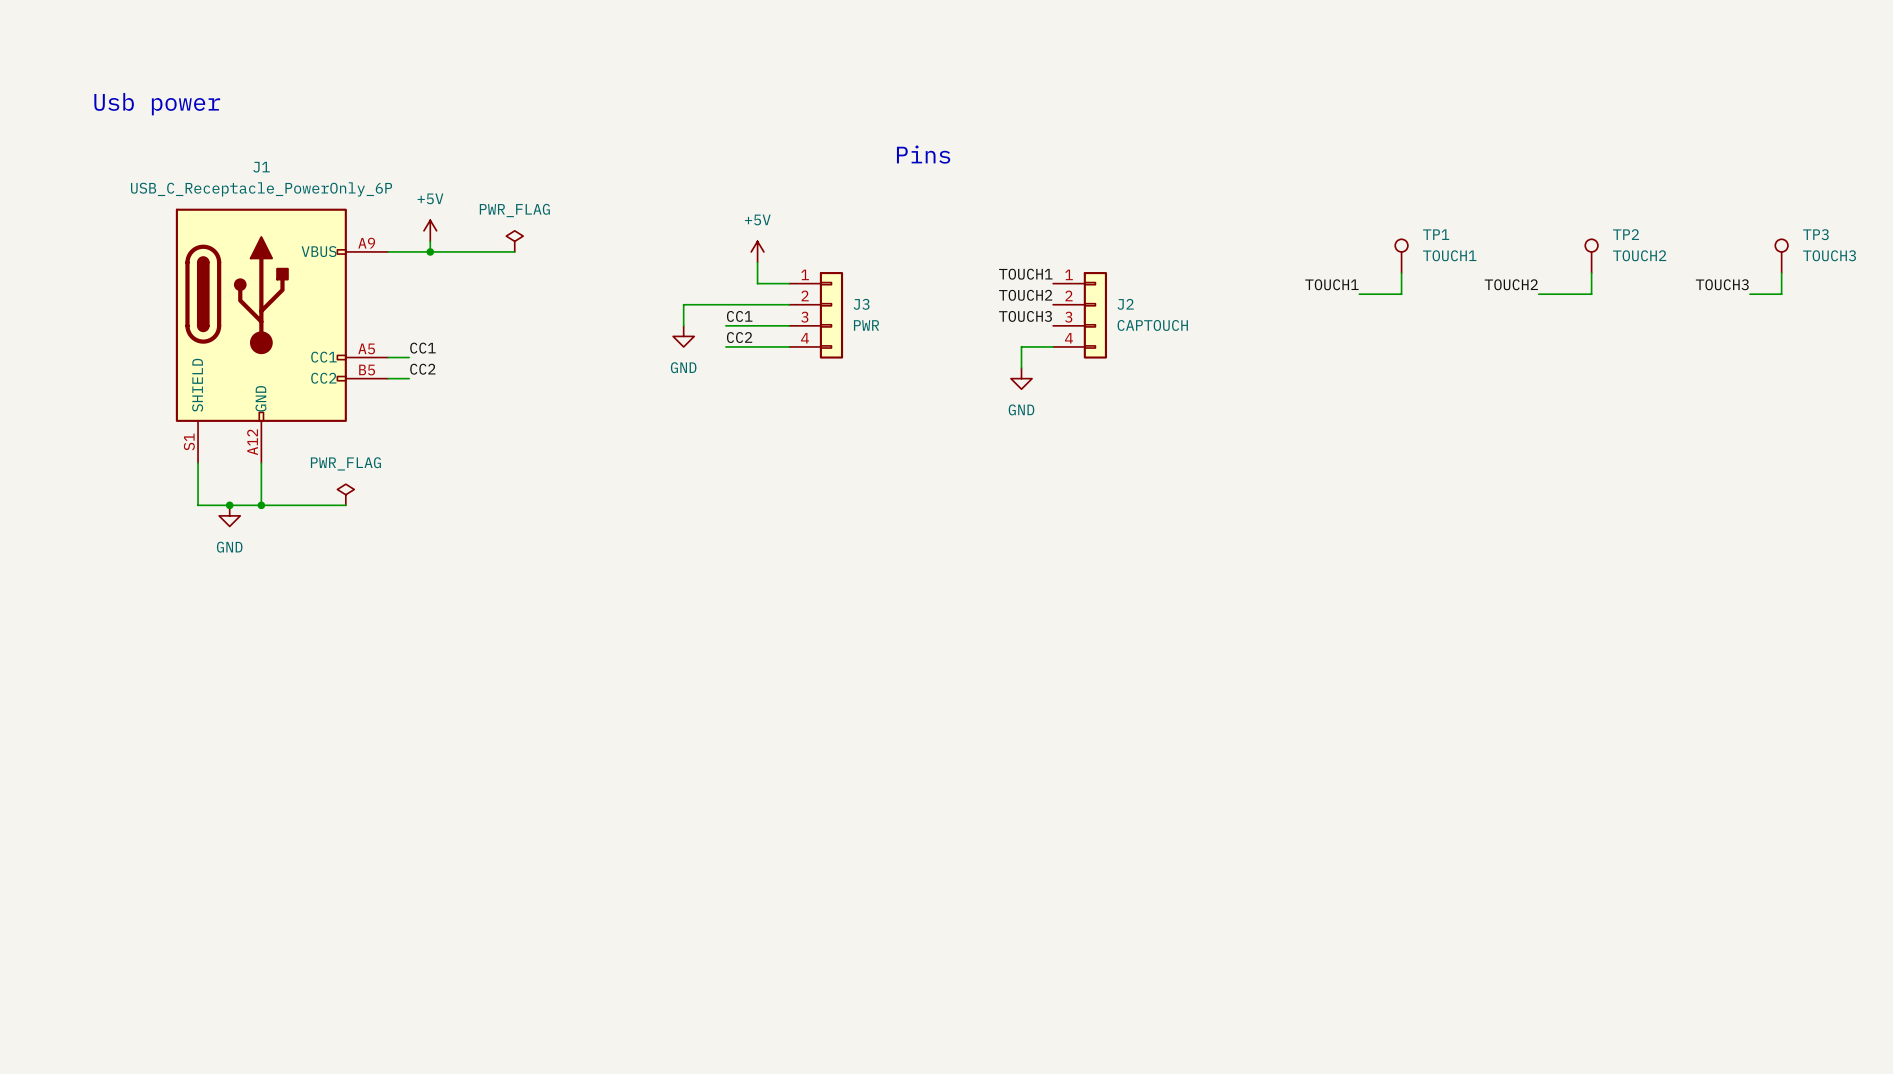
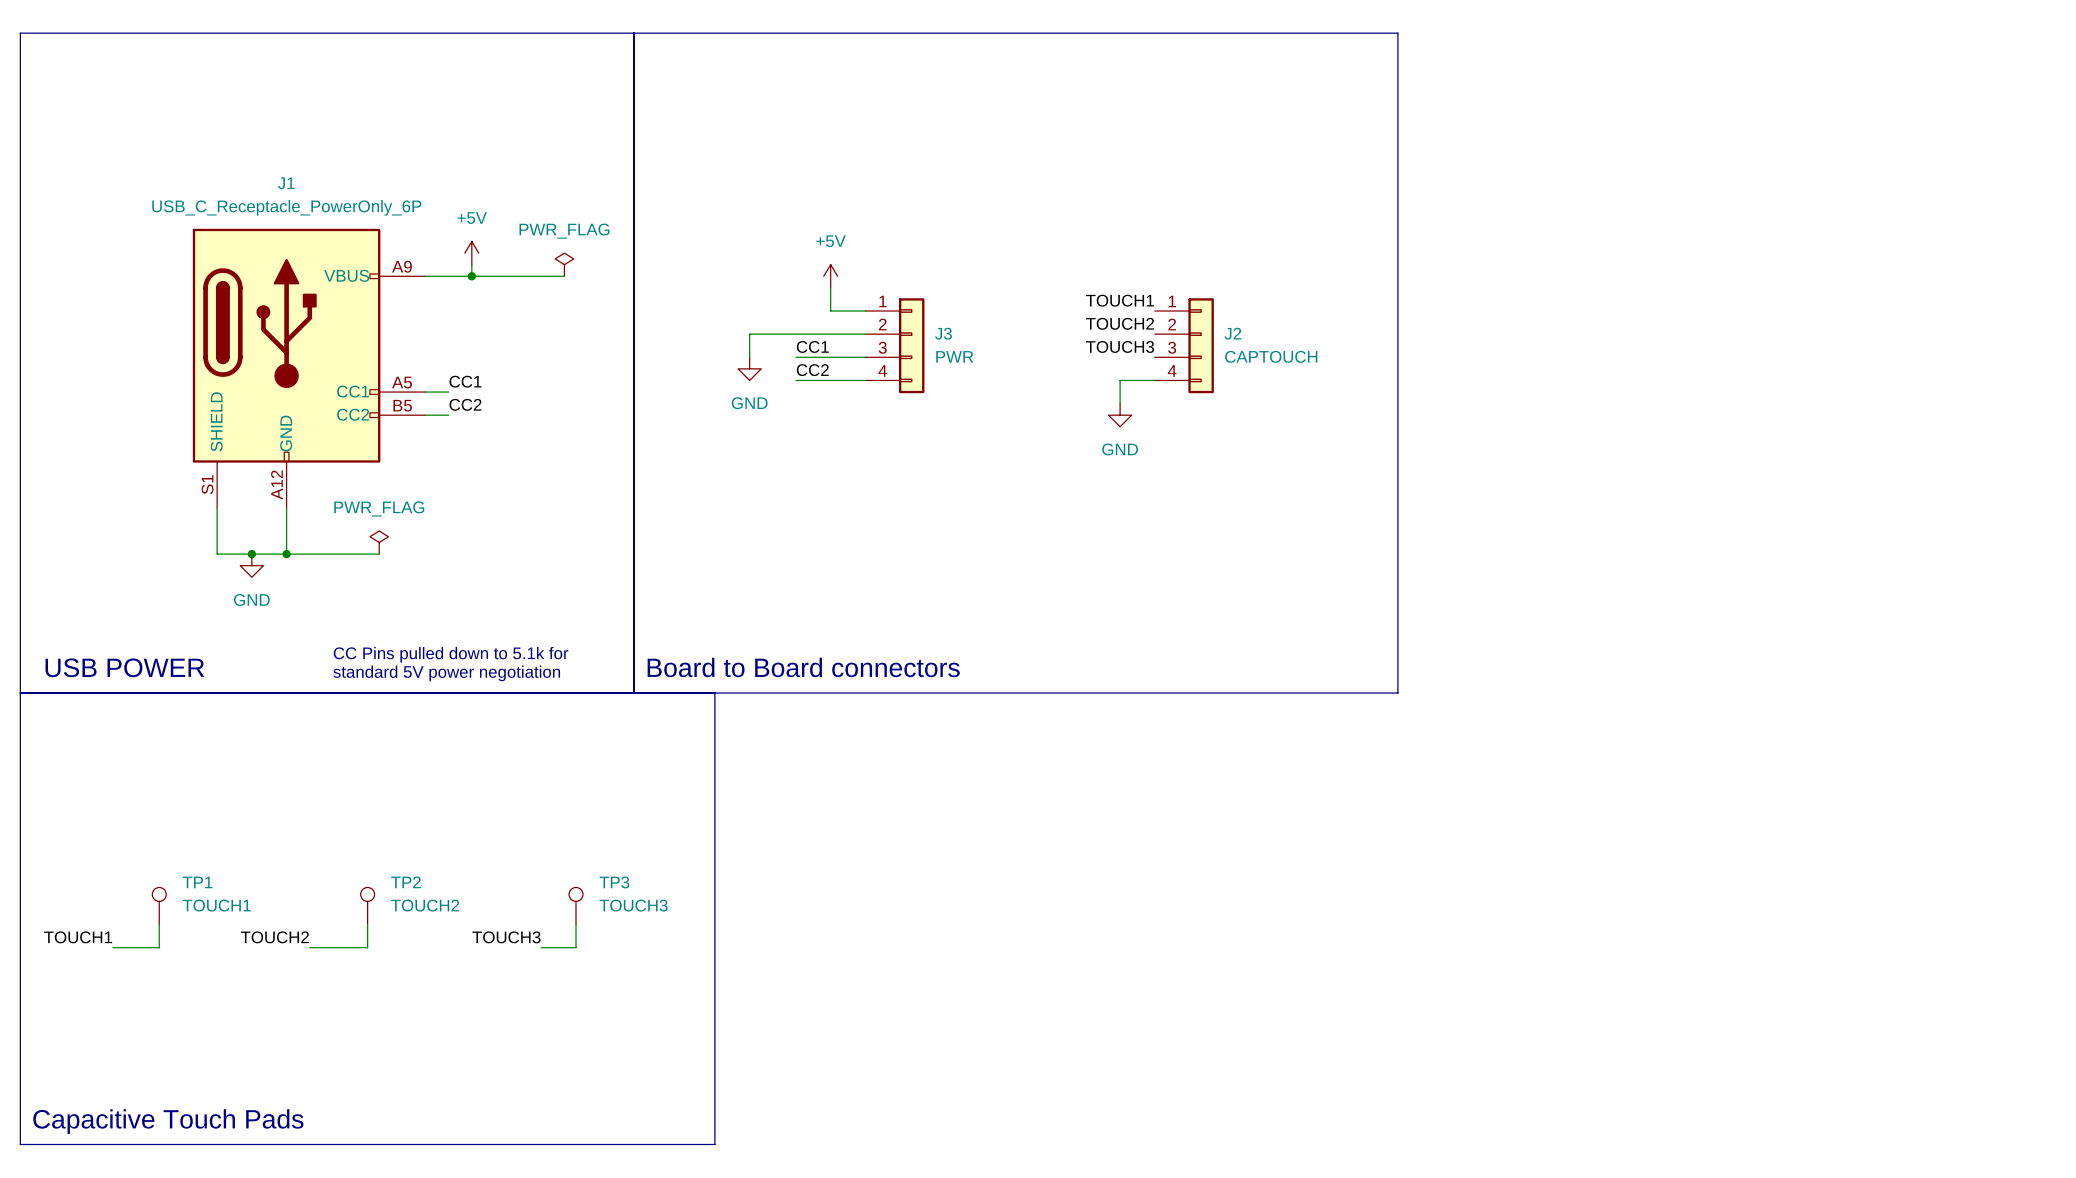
line: none -> (633, 33) (633, 693)
text: Usb power (157, 104) -> none
text: Pins (923, 154) -> none
TP1 position: (1401, 256) -> (159, 906)
TP2 position: (1591, 256) -> (367, 906)
TP3 position: (1781, 256) -> (576, 906)
wire: (1401, 273) (1401, 294) (1359, 294) -> none
wire: (1591, 273) (1591, 294) (1538, 294) -> none
wire: (1781, 273) (1781, 294) (1749, 294) -> none
label: TOUCH1 (1331, 284) -> none
label: TOUCH2 (1511, 284) -> none
label: TOUCH3 (1722, 284) -> none
text: none -> CC Pins pulled down to 5.1k for (451, 654)
text: none -> Board to Board connectors (803, 667)
text: none -> USB POWER (124, 667)
text: none -> standard 5V power negotiation (446, 673)
line: none -> (20, 693) (1397, 693) (1397, 33) (20, 33) (20, 1144) (714, 1144) (714, 693)
wire: none -> (159, 924) (159, 947) (112, 947)
wire: none -> (367, 924) (367, 947) (309, 947)
wire: none -> (576, 924) (576, 947) (541, 947)
label: none -> TOUCH1 (78, 937)
label: none -> TOUCH2 (274, 937)
label: none -> TOUCH3 (506, 937)
text: none -> Capacitive Touch Pads (168, 1121)

